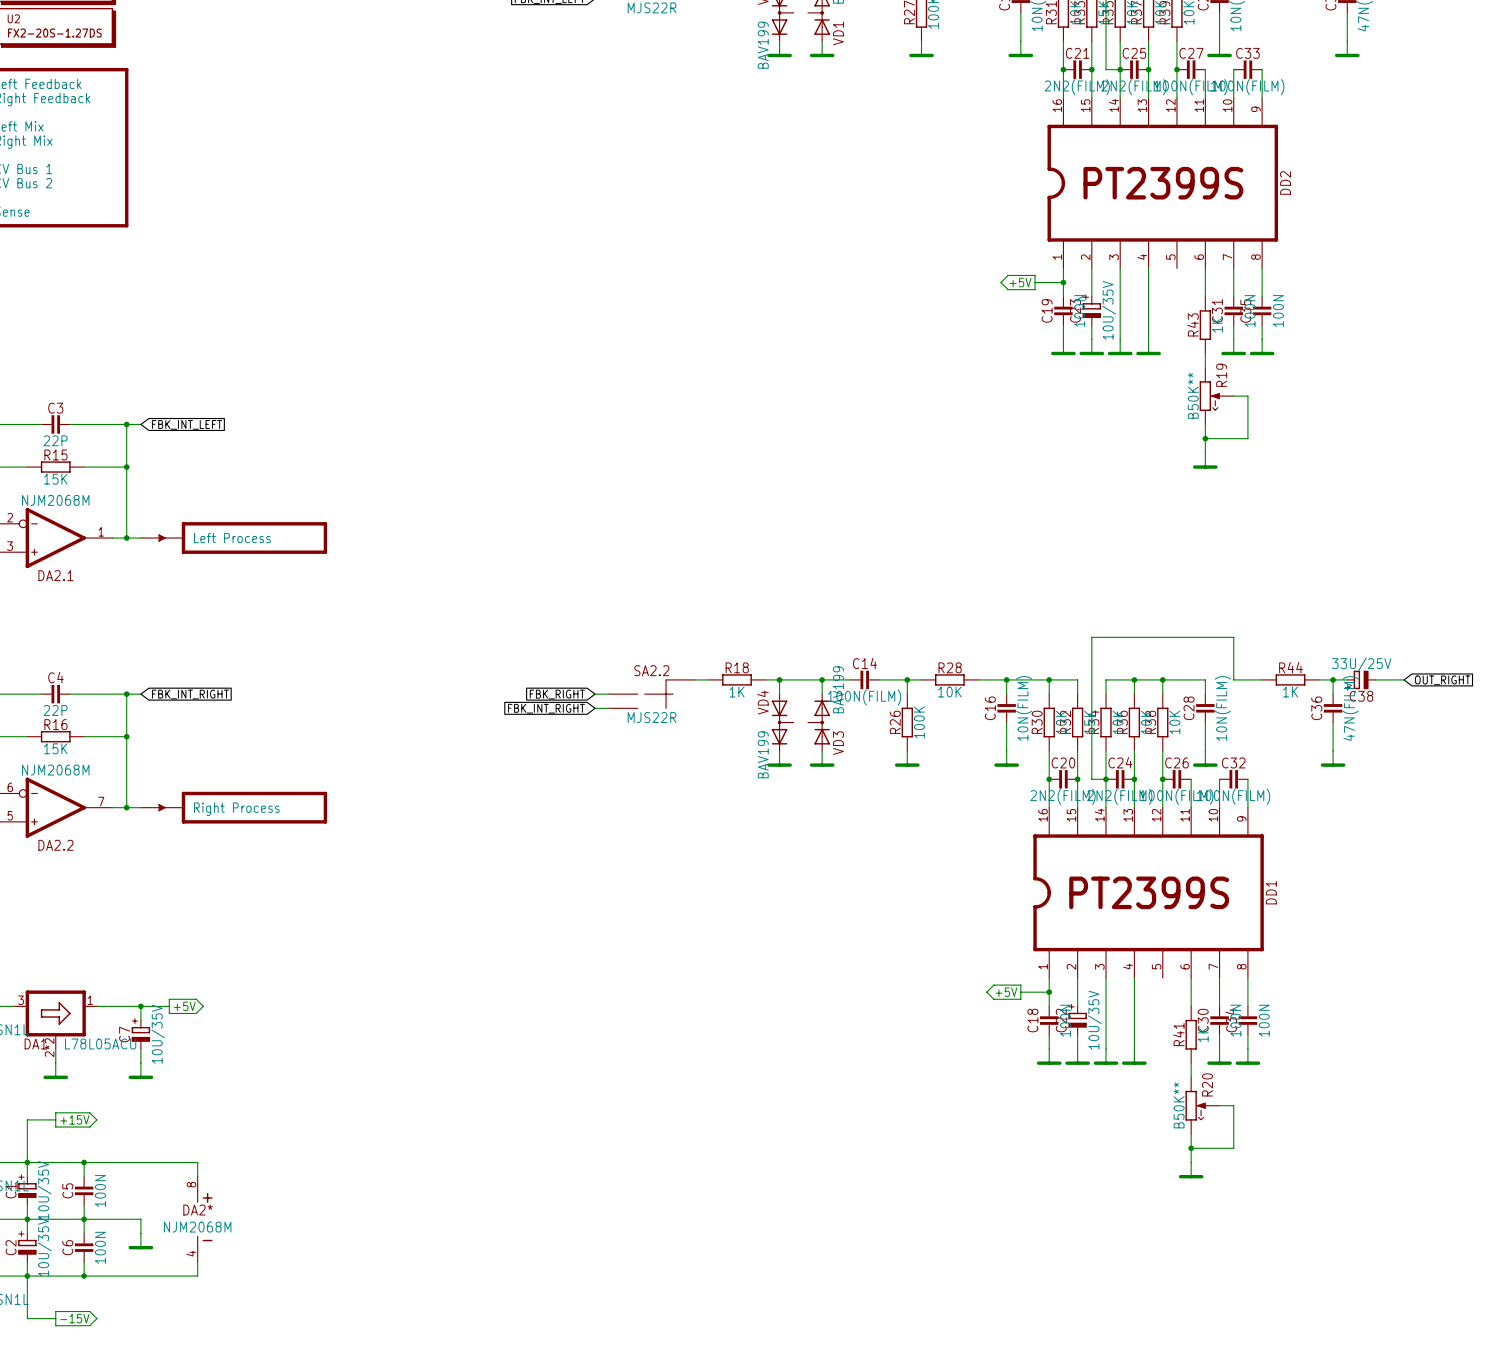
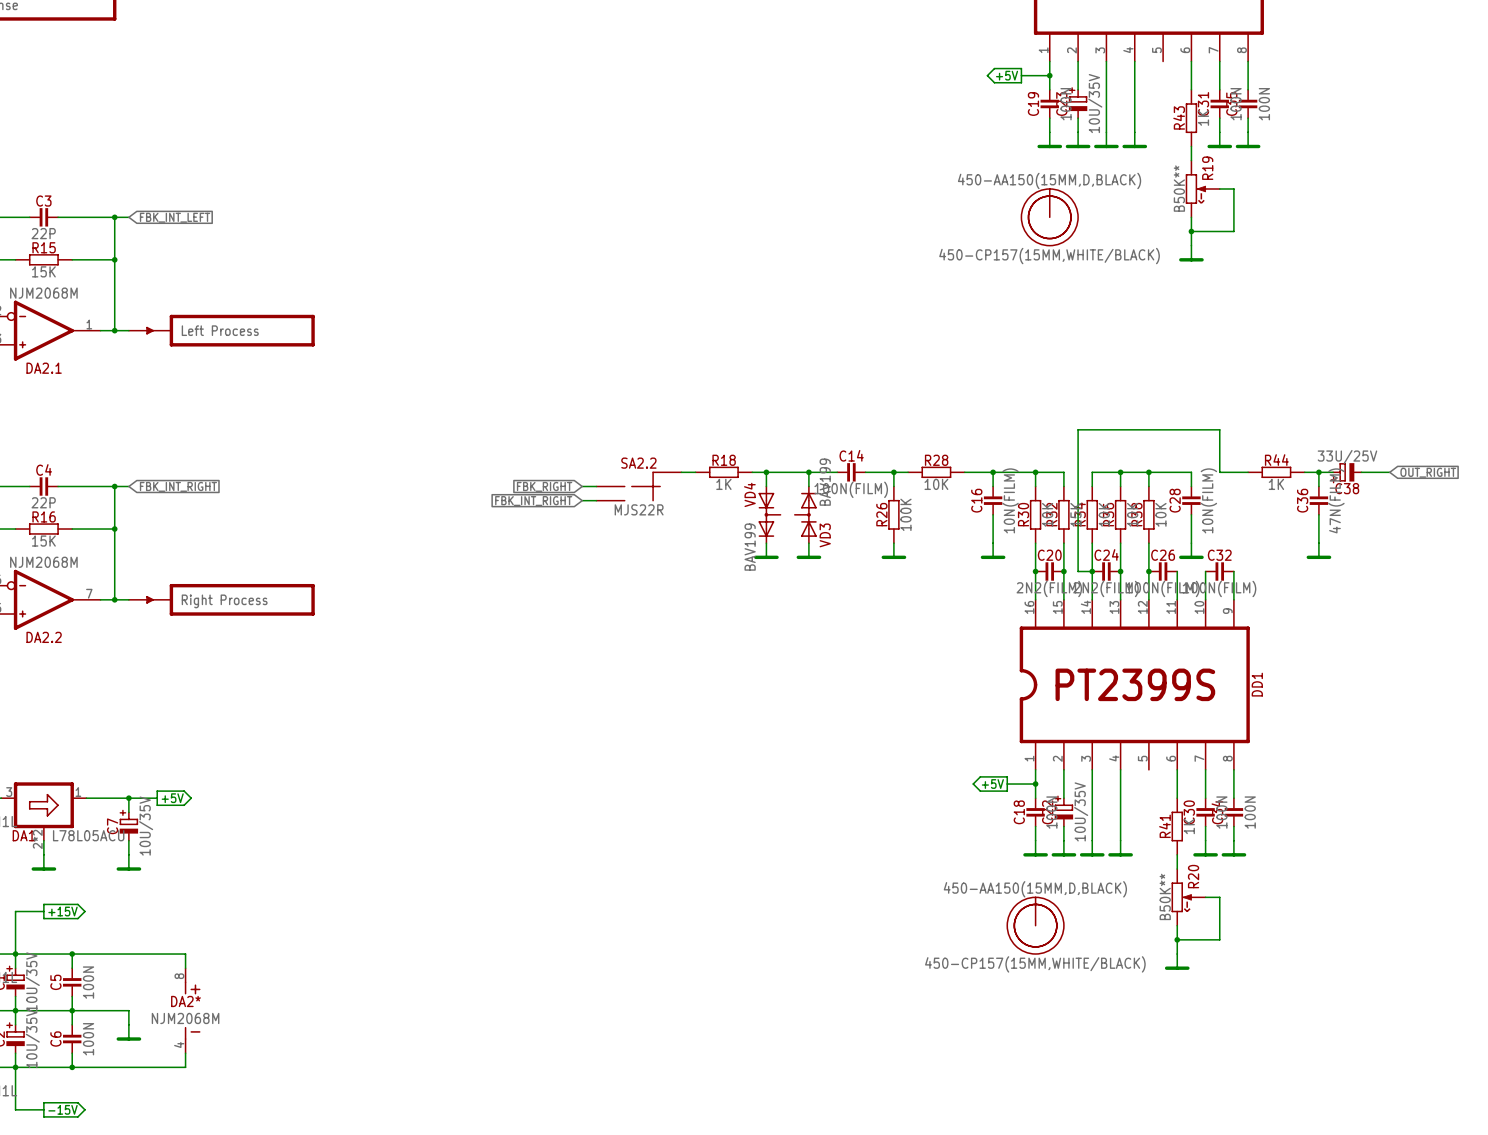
part: none -> 450-AA150(15MM,D,BLACK) (1049, 217)
part: none -> 450-CP157(15MM,WHITE/BLACK) (1049, 217)
part: none -> 450-AA150(15MM,D,BLACK) (1035, 925)
part: none -> 450-CP157(15MM,WHITE/BLACK) (1035, 925)

